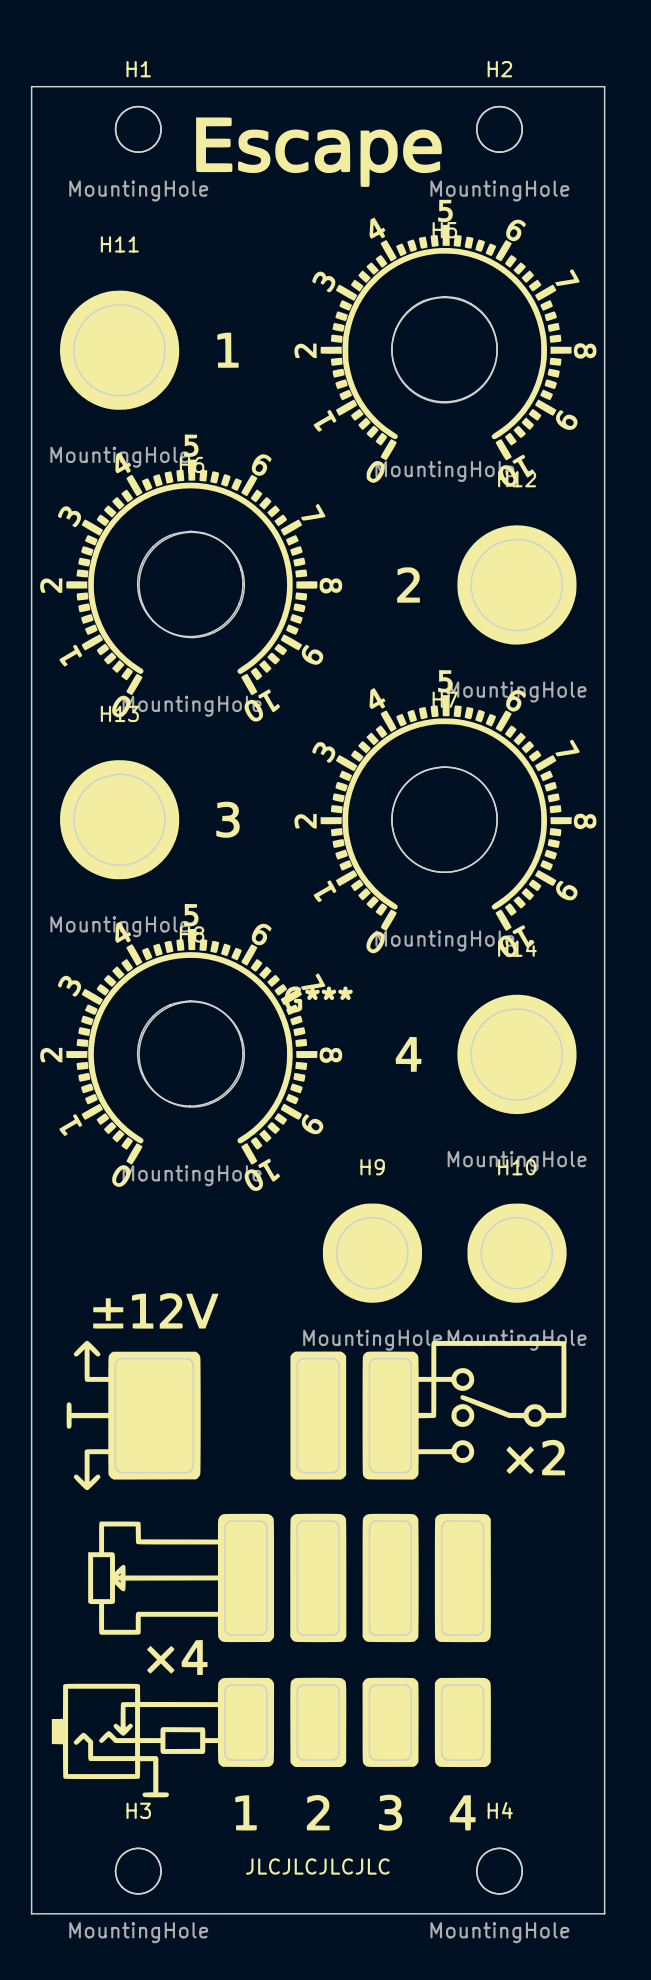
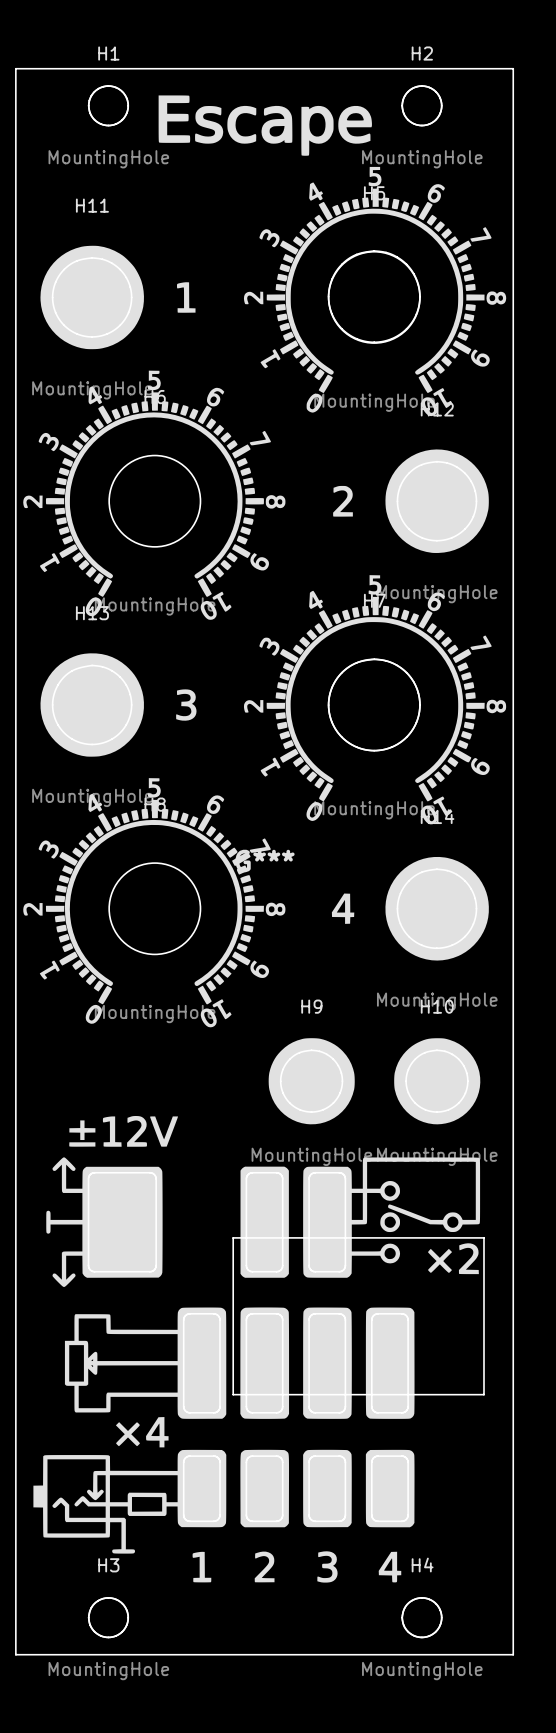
board edge: (190, 531) (168, 535) (153, 546) (141, 563) (137, 584) (141, 603) (153, 621) (170, 632) (190, 636) (210, 632) (227, 621) (238, 604) (242, 583) (238, 563) (227, 546) (210, 535) (190, 531) -> none
board edge: (190, 1000) (210, 1004) (227, 1016) (238, 1033) (242, 1053) (238, 1073) (227, 1090) (210, 1102) (190, 1106) (170, 1102) (153, 1090) (141, 1073) (137, 1053) (141, 1033) (153, 1016) (168, 1005) (190, 1000) -> none
board edge: none -> (233, 1237) (233, 1394) (483, 1394) (483, 1237) (233, 1237)
text: JLCJLCJLCJLC (317, 1866) -> none

